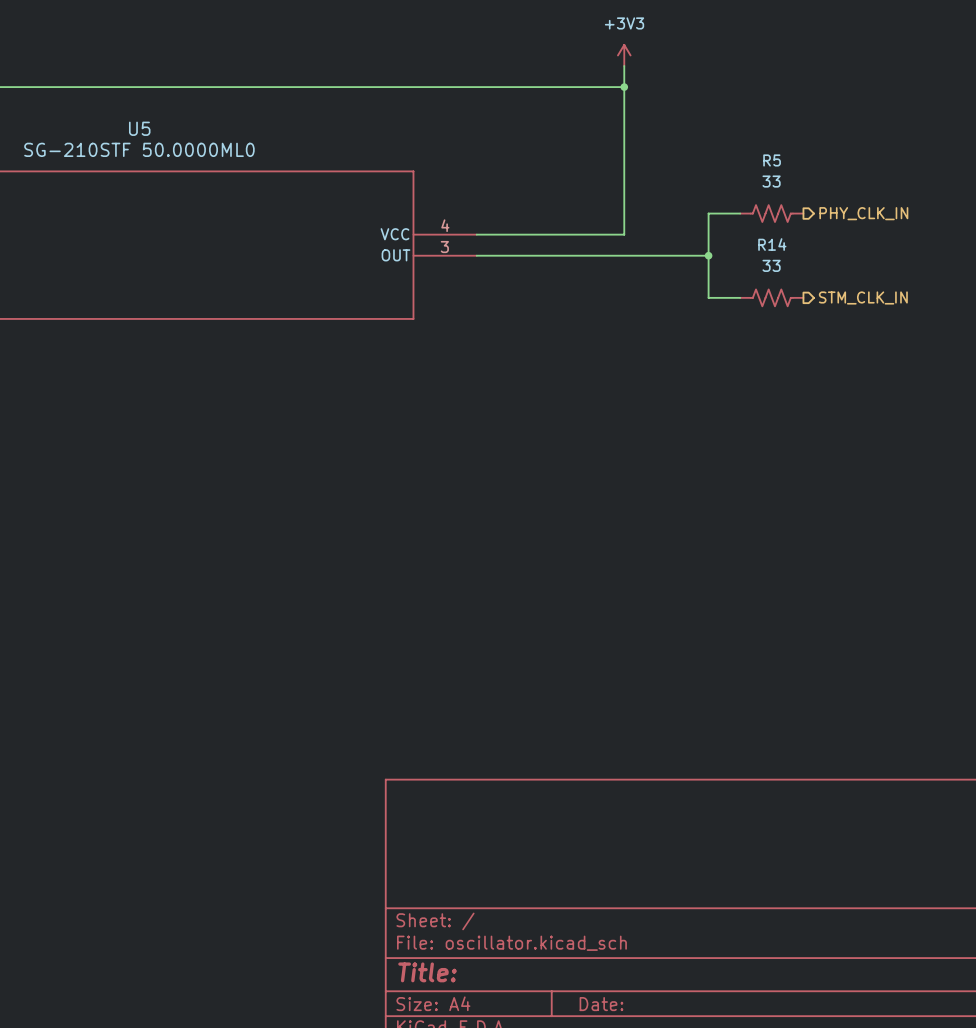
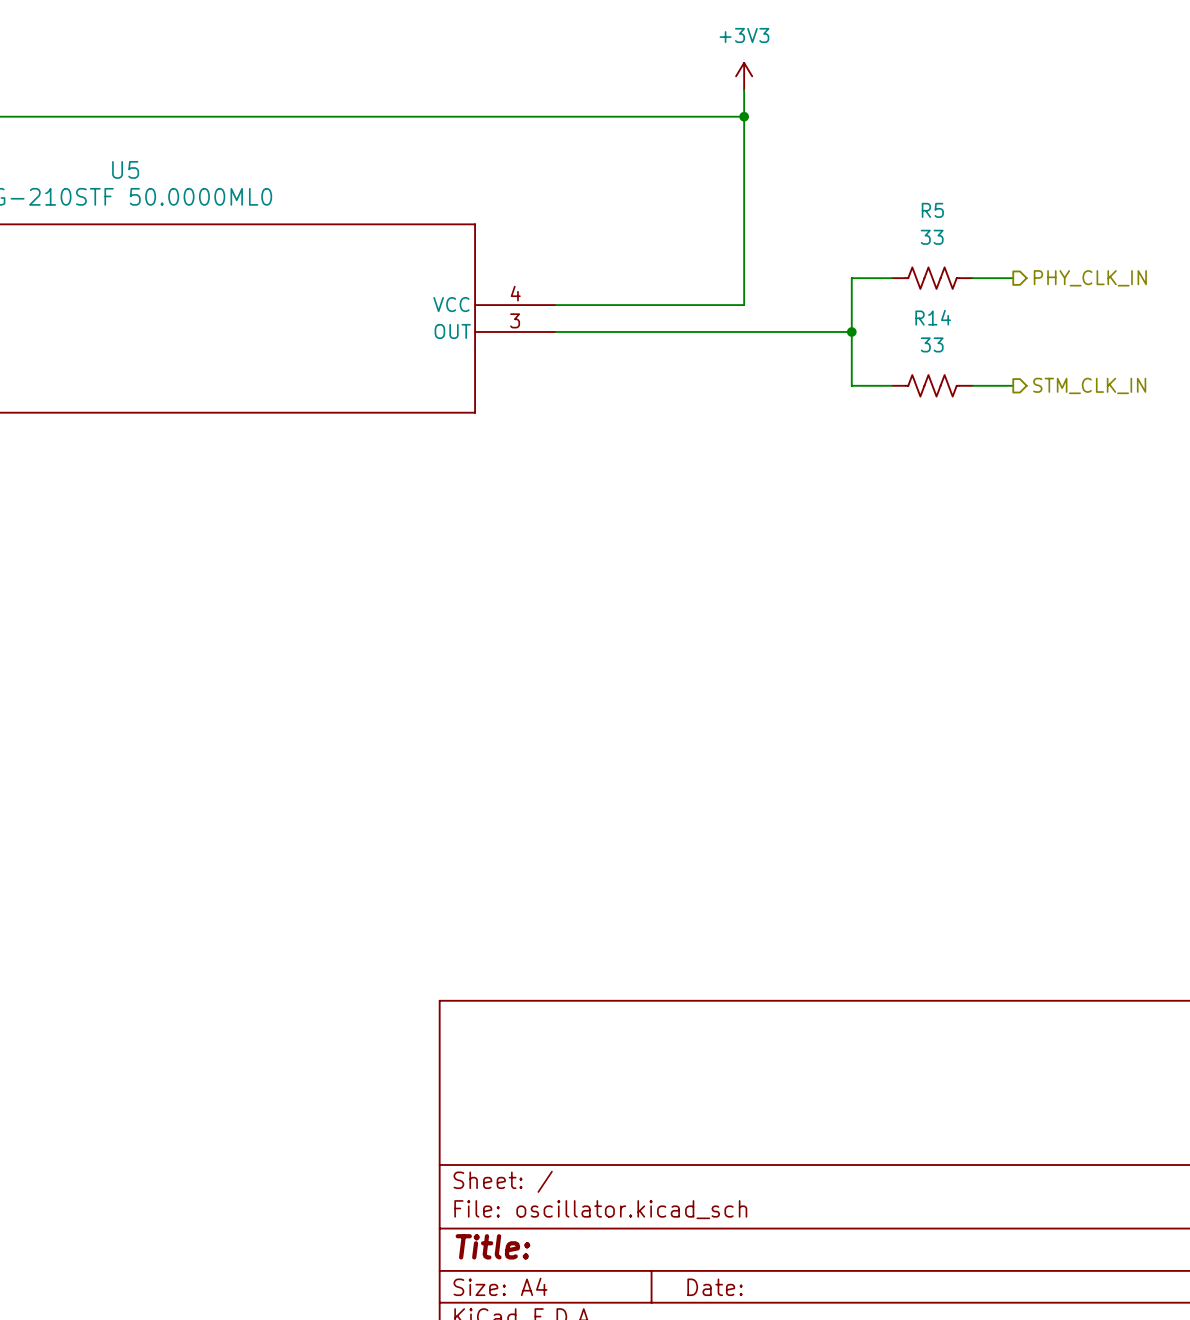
wire: none -> (972, 278) (1013, 278)
hierarchical label position: PHY_CLK_IN (863, 213) -> PHY_CLK_IN (1090, 278)
wire: none -> (972, 385) (1013, 385)
hierarchical label position: STM_CLK_IN (863, 297) -> STM_CLK_IN (1089, 385)

